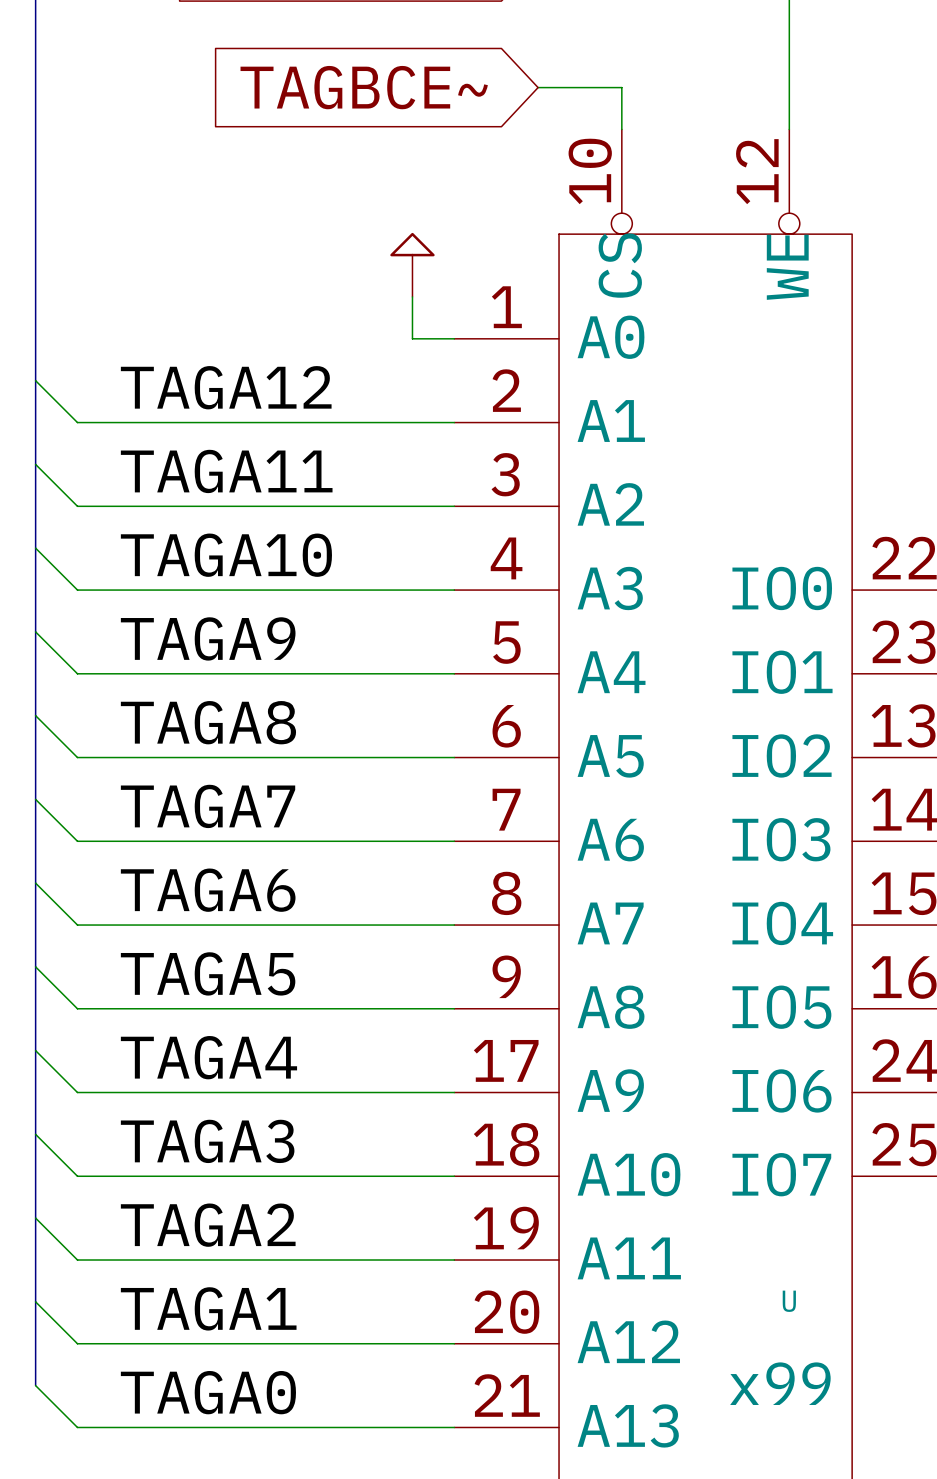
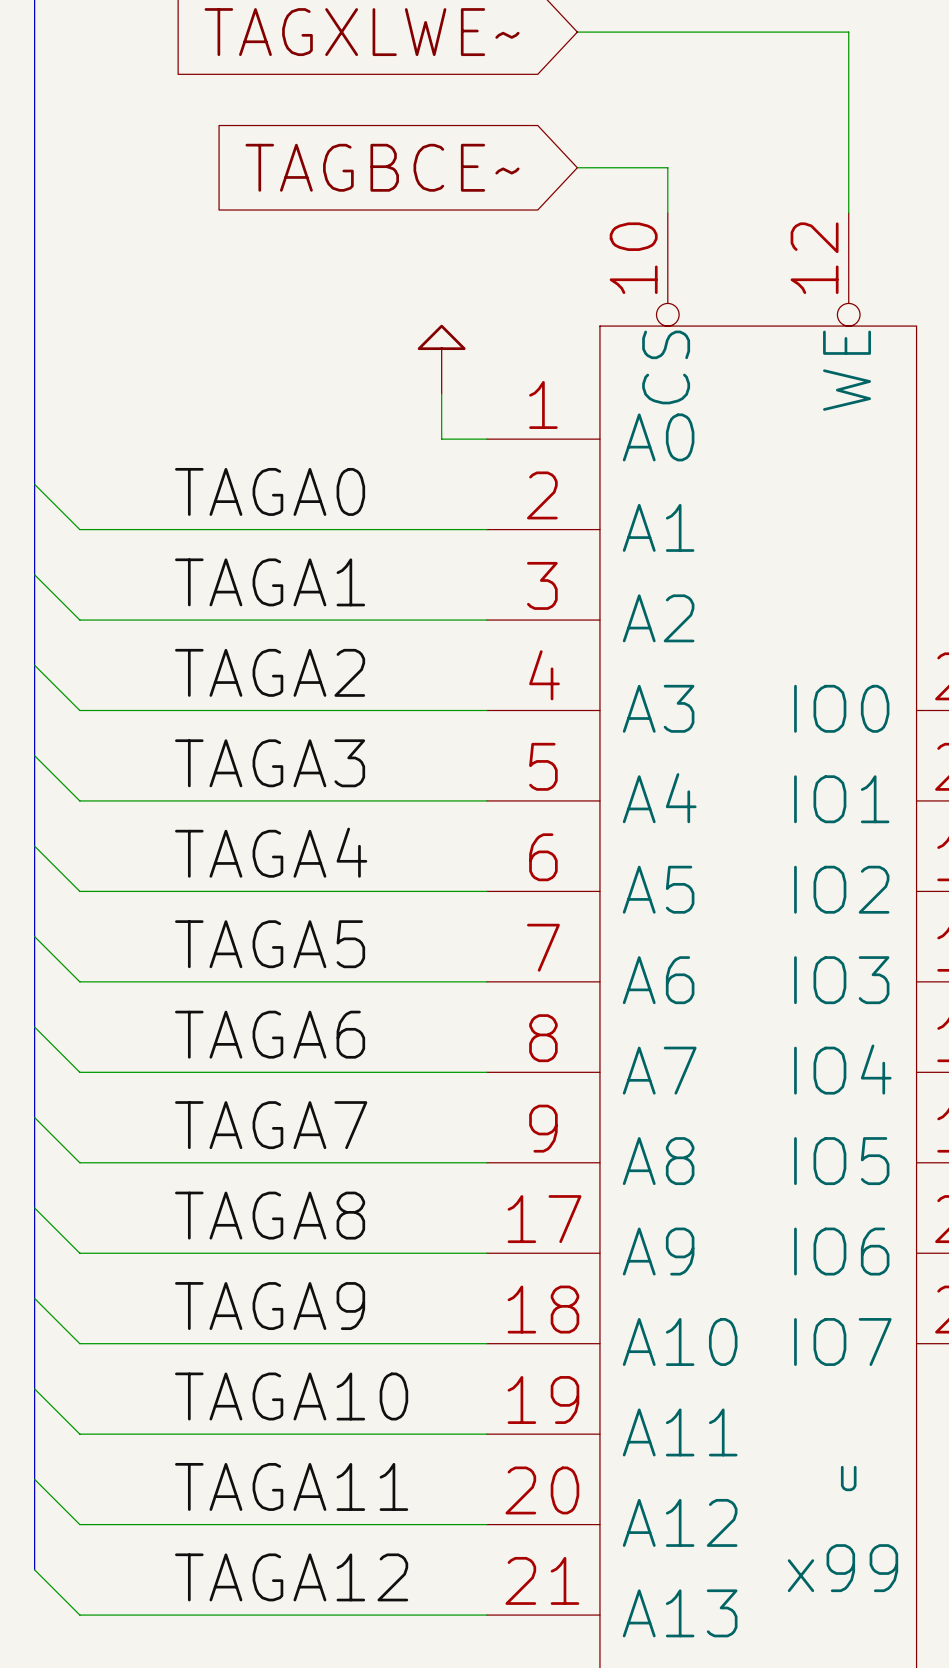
label: TAGA12 (226, 387) -> TAGA0 (270, 491)
label: TAGA11 (226, 471) -> TAGA1 (270, 582)
label: TAGA10 (226, 555) -> TAGA2 (270, 672)
label: TAGA9 (208, 638) -> TAGA3 (270, 763)
label position: TAGA8 (208, 722) -> TAGA8 (270, 1215)
label position: TAGA7 (208, 806) -> TAGA7 (271, 1125)
label position: TAGA6 (208, 890) -> TAGA6 (270, 1034)
label position: TAGA5 (208, 973) -> TAGA5 (270, 944)
label position: TAGA4 (208, 1057) -> TAGA4 (271, 852)
label: TAGA3 (207, 1141) -> TAGA9 (270, 1306)
label: TAGA2 (208, 1225) -> TAGA10 (291, 1396)
label: TAGA1 (208, 1308) -> TAGA11 (291, 1486)
label: TAGA0 (208, 1392) -> TAGA12 (291, 1577)

